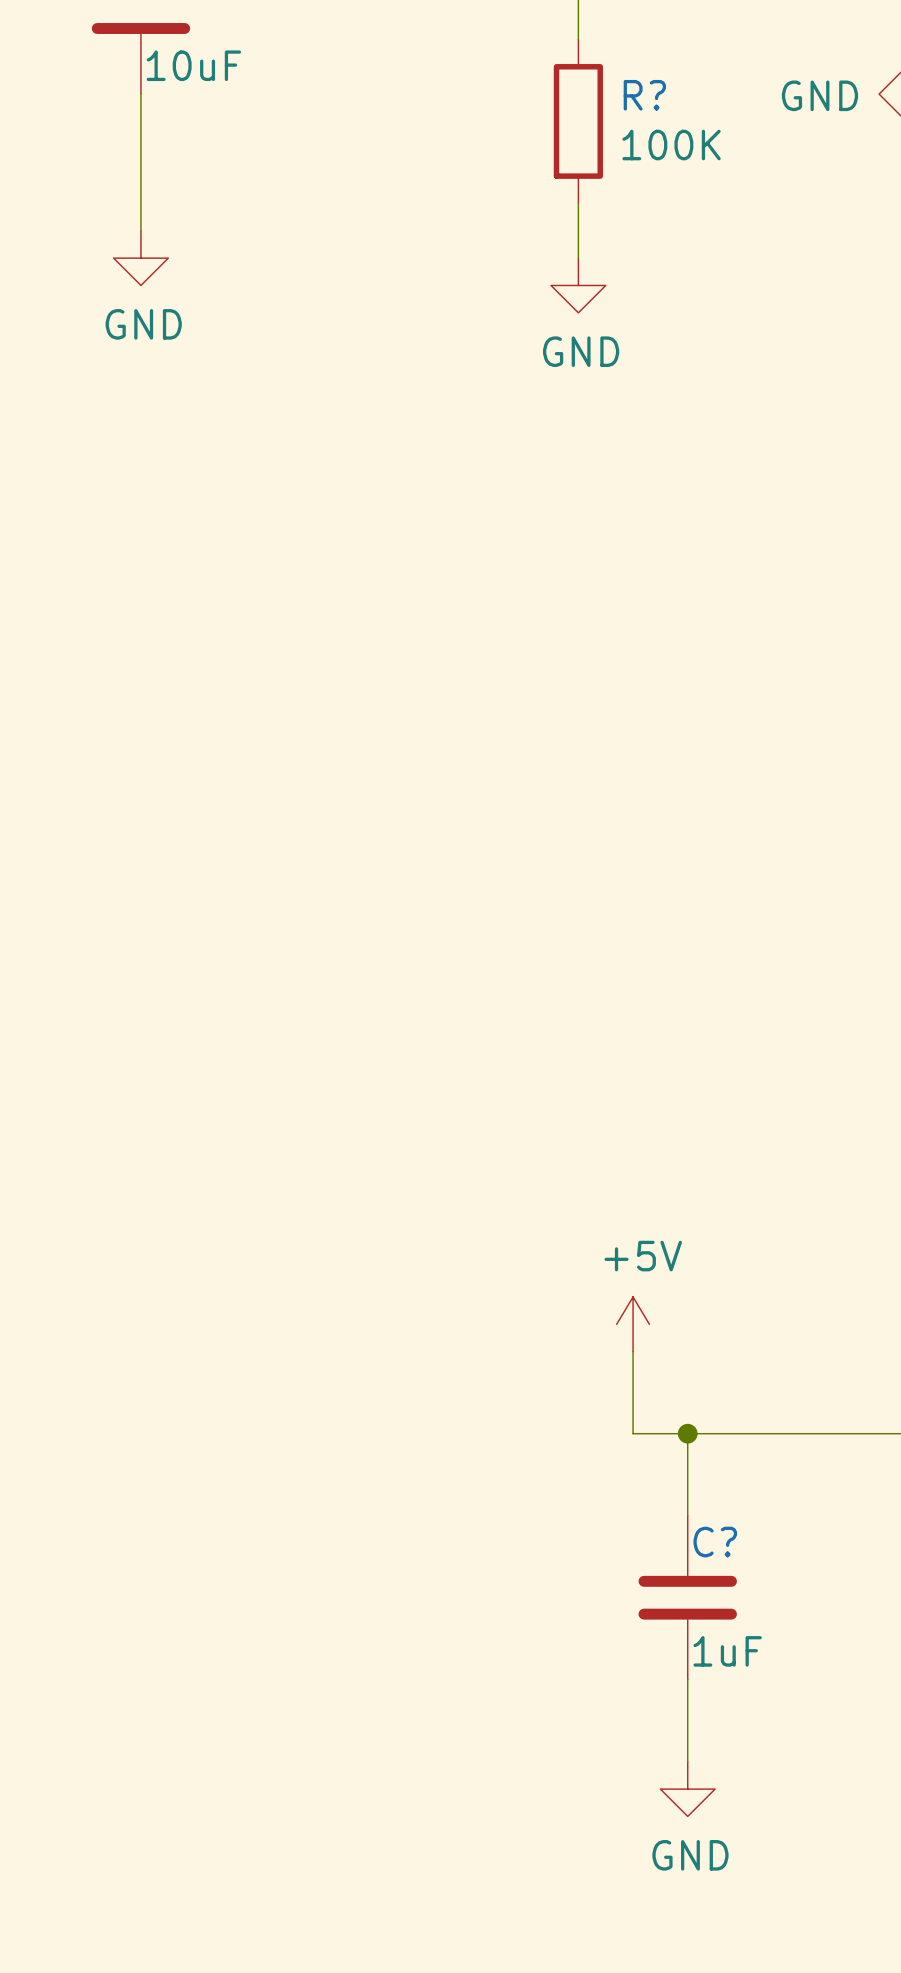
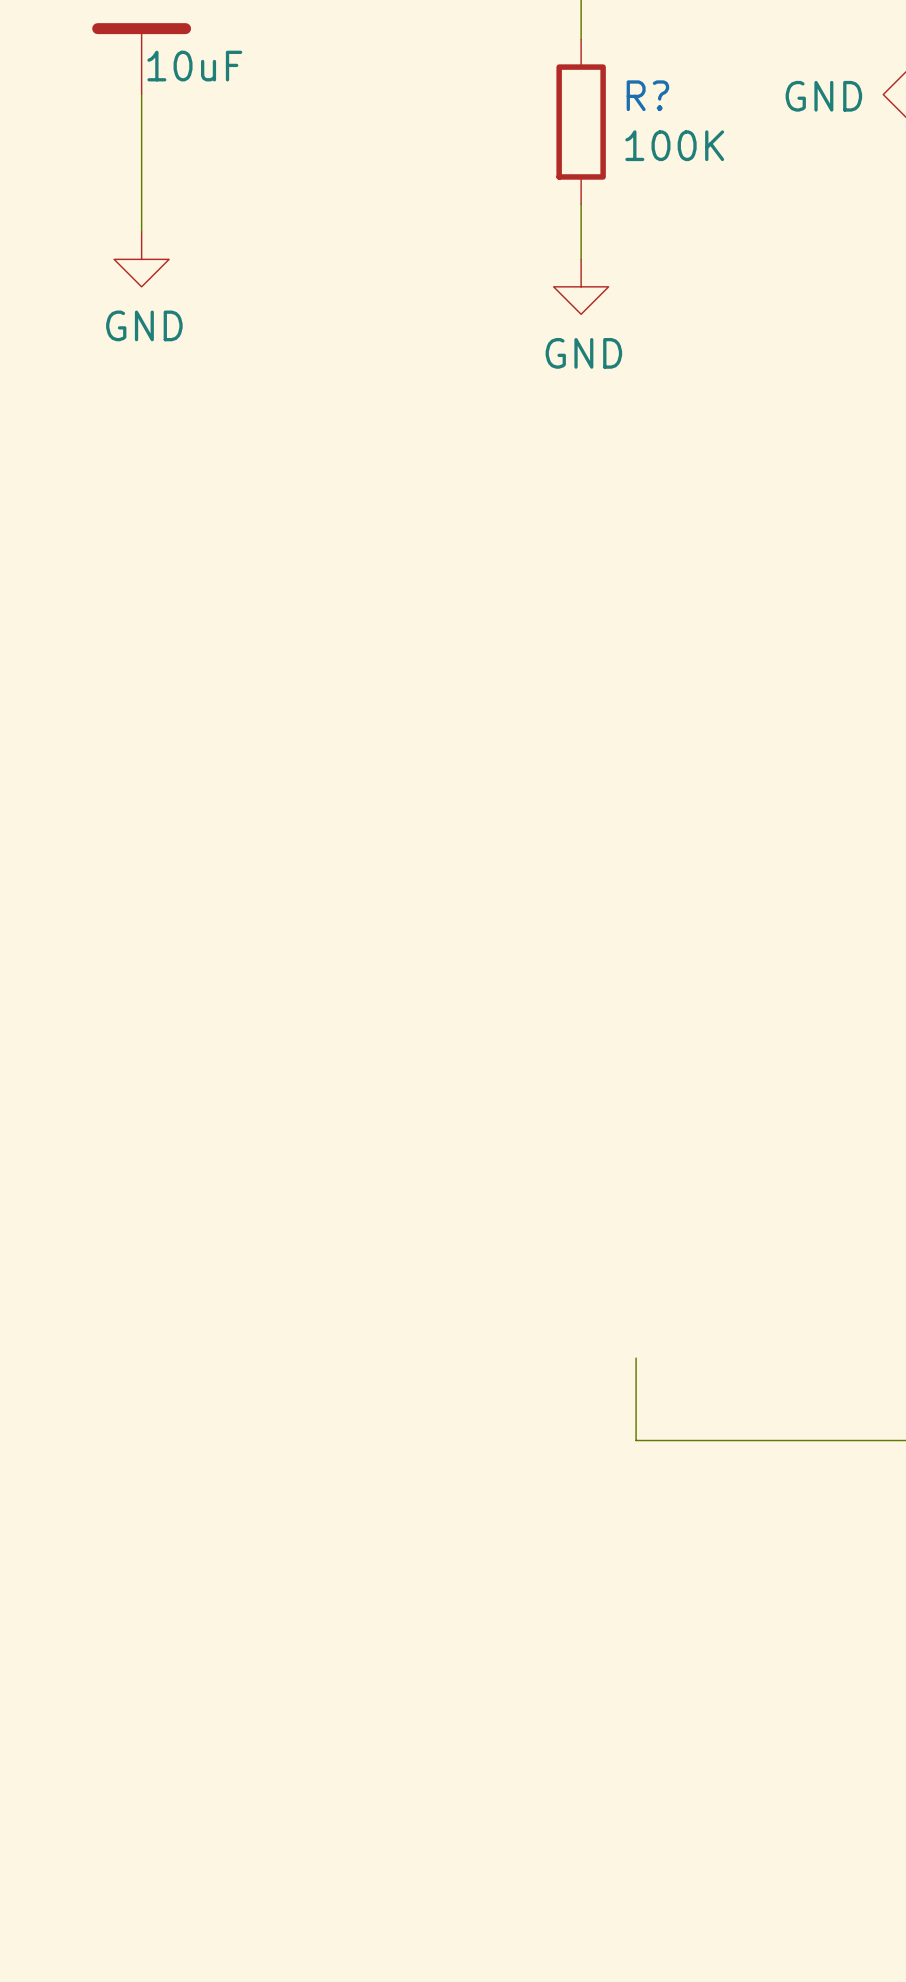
power symbol: +5V (633, 1324) -> none
wire: (687, 1433) (687, 1515) -> none
junction: (687, 1433) -> none
C?: 1uF (687, 1597) -> none
wire: (687, 1679) (687, 1761) -> none
power symbol: GND (687, 1789) -> none

